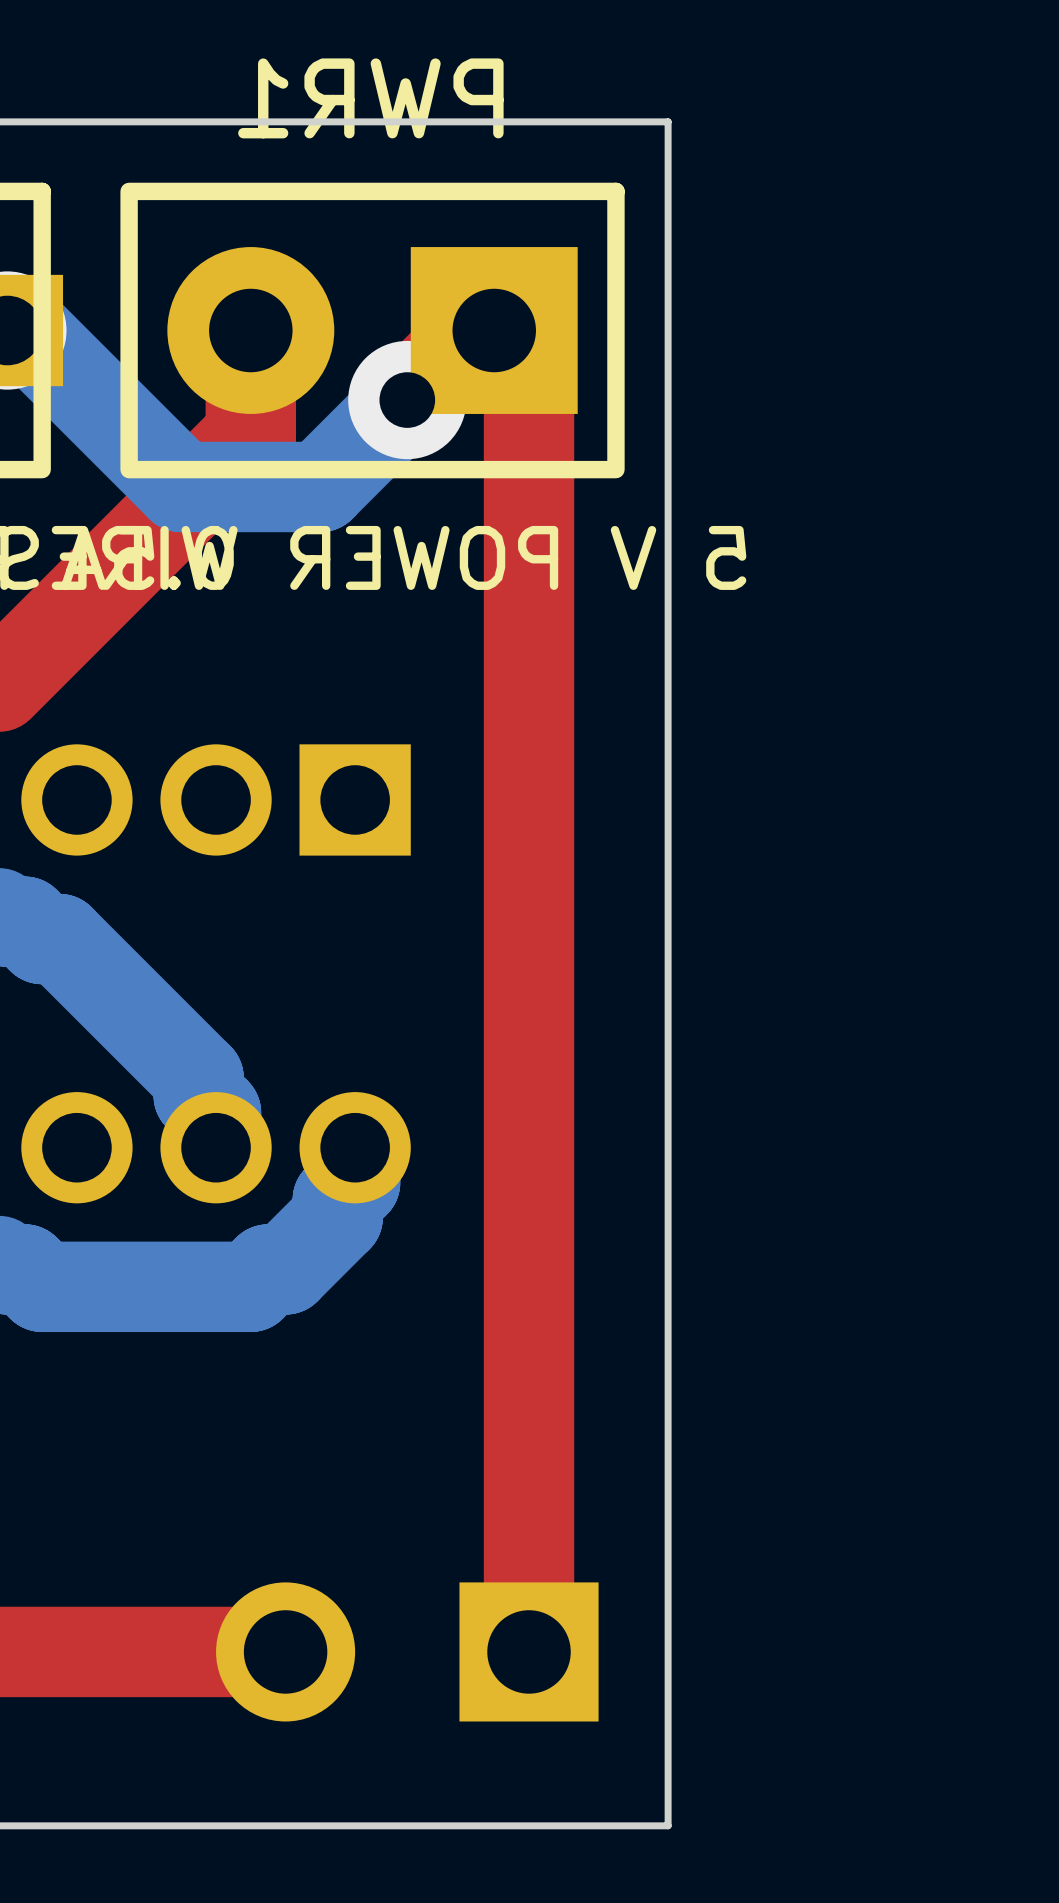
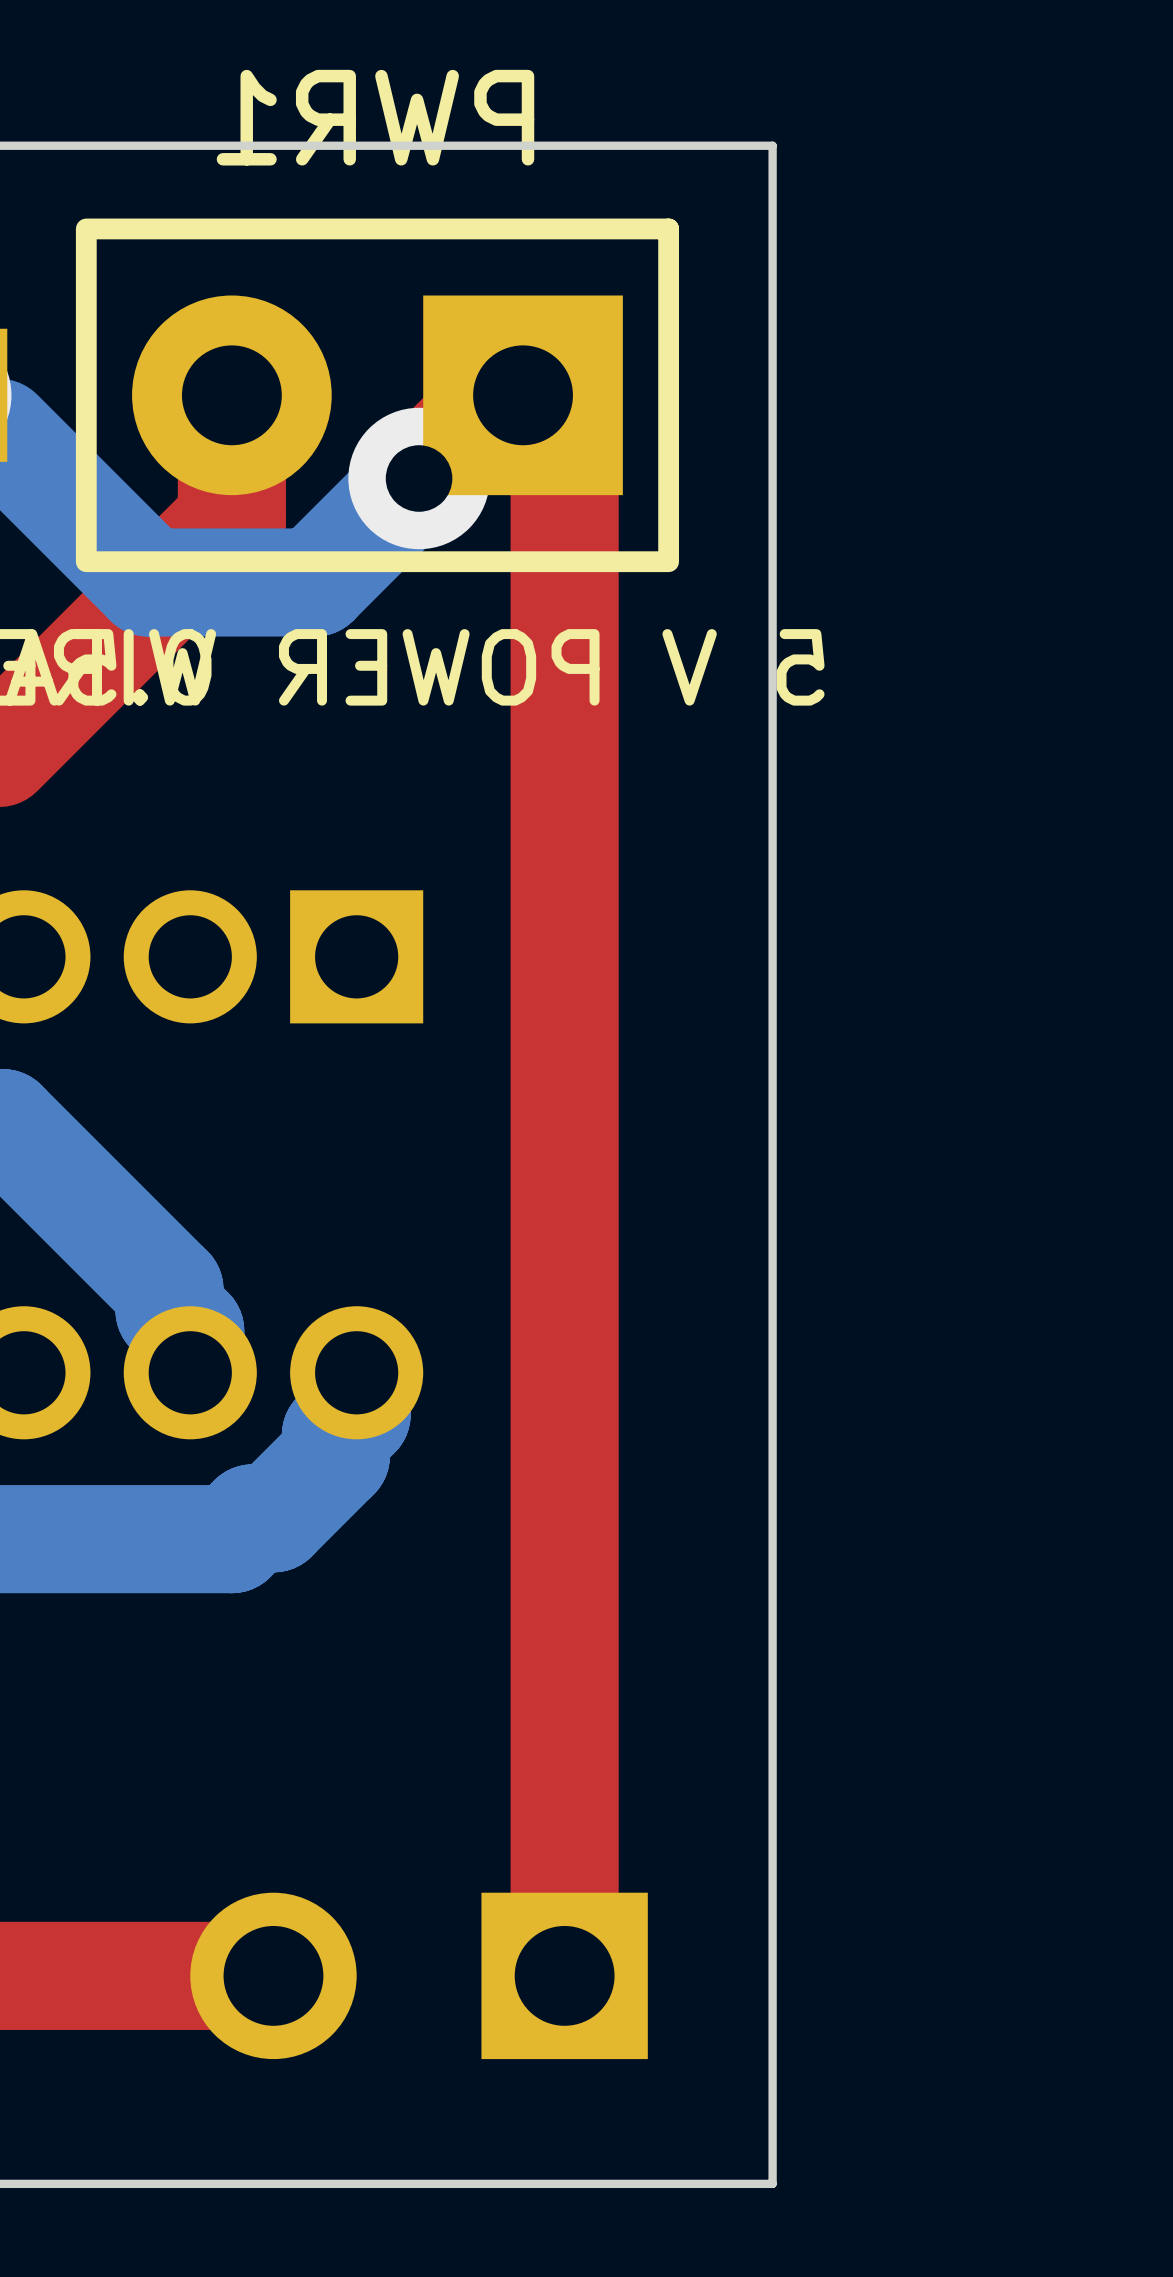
board edge: (668, 121) (668, 1825) -> (731, 145) (772, 145) (772, 2183) (731, 2183)

